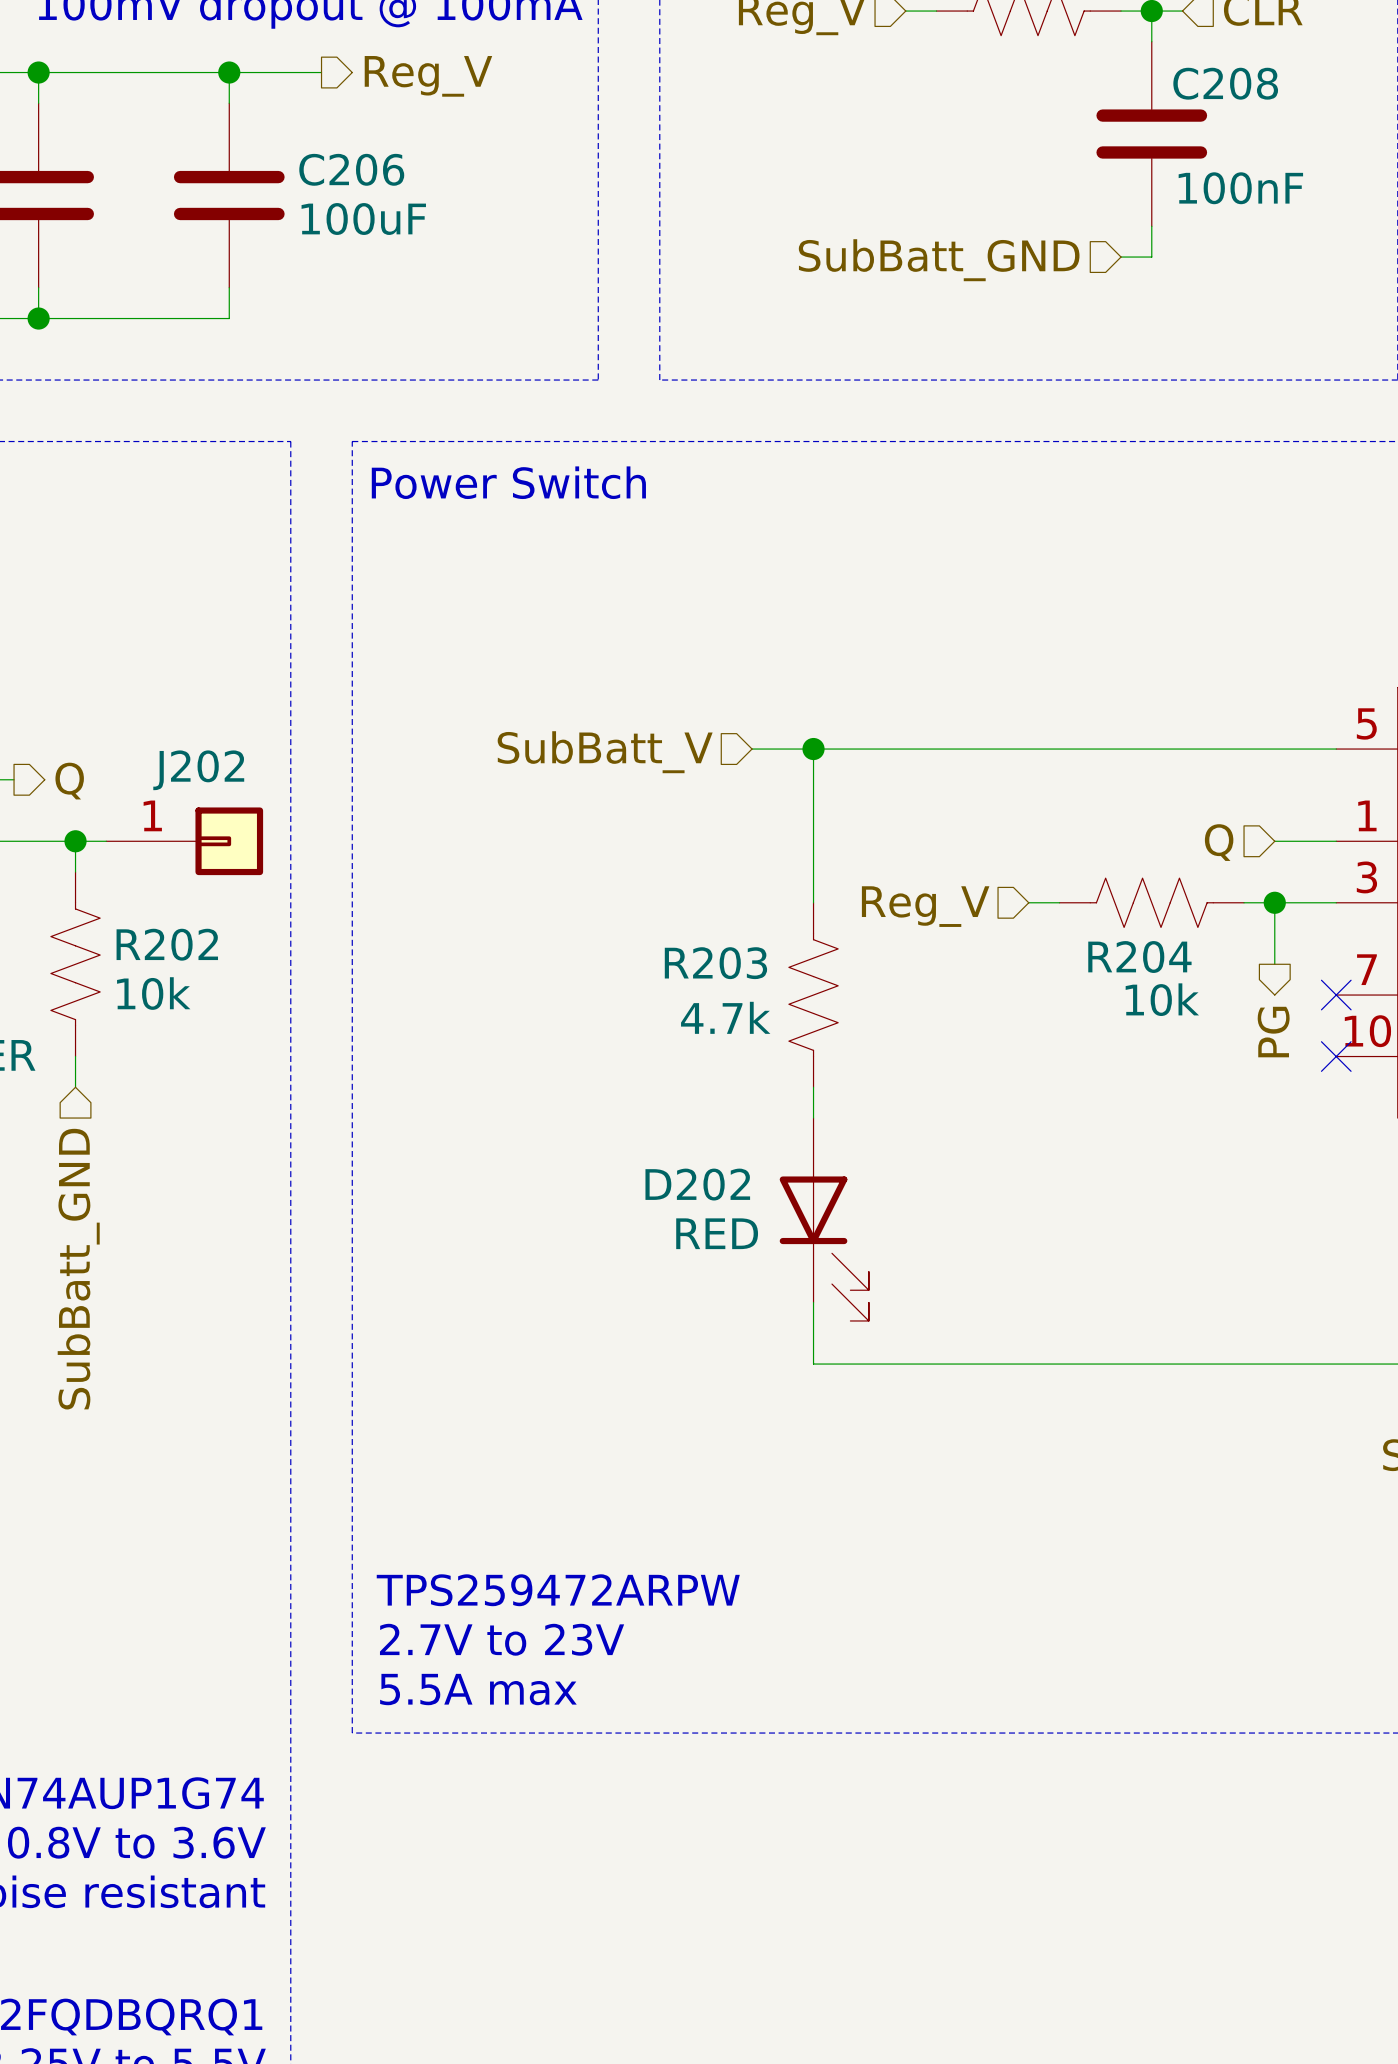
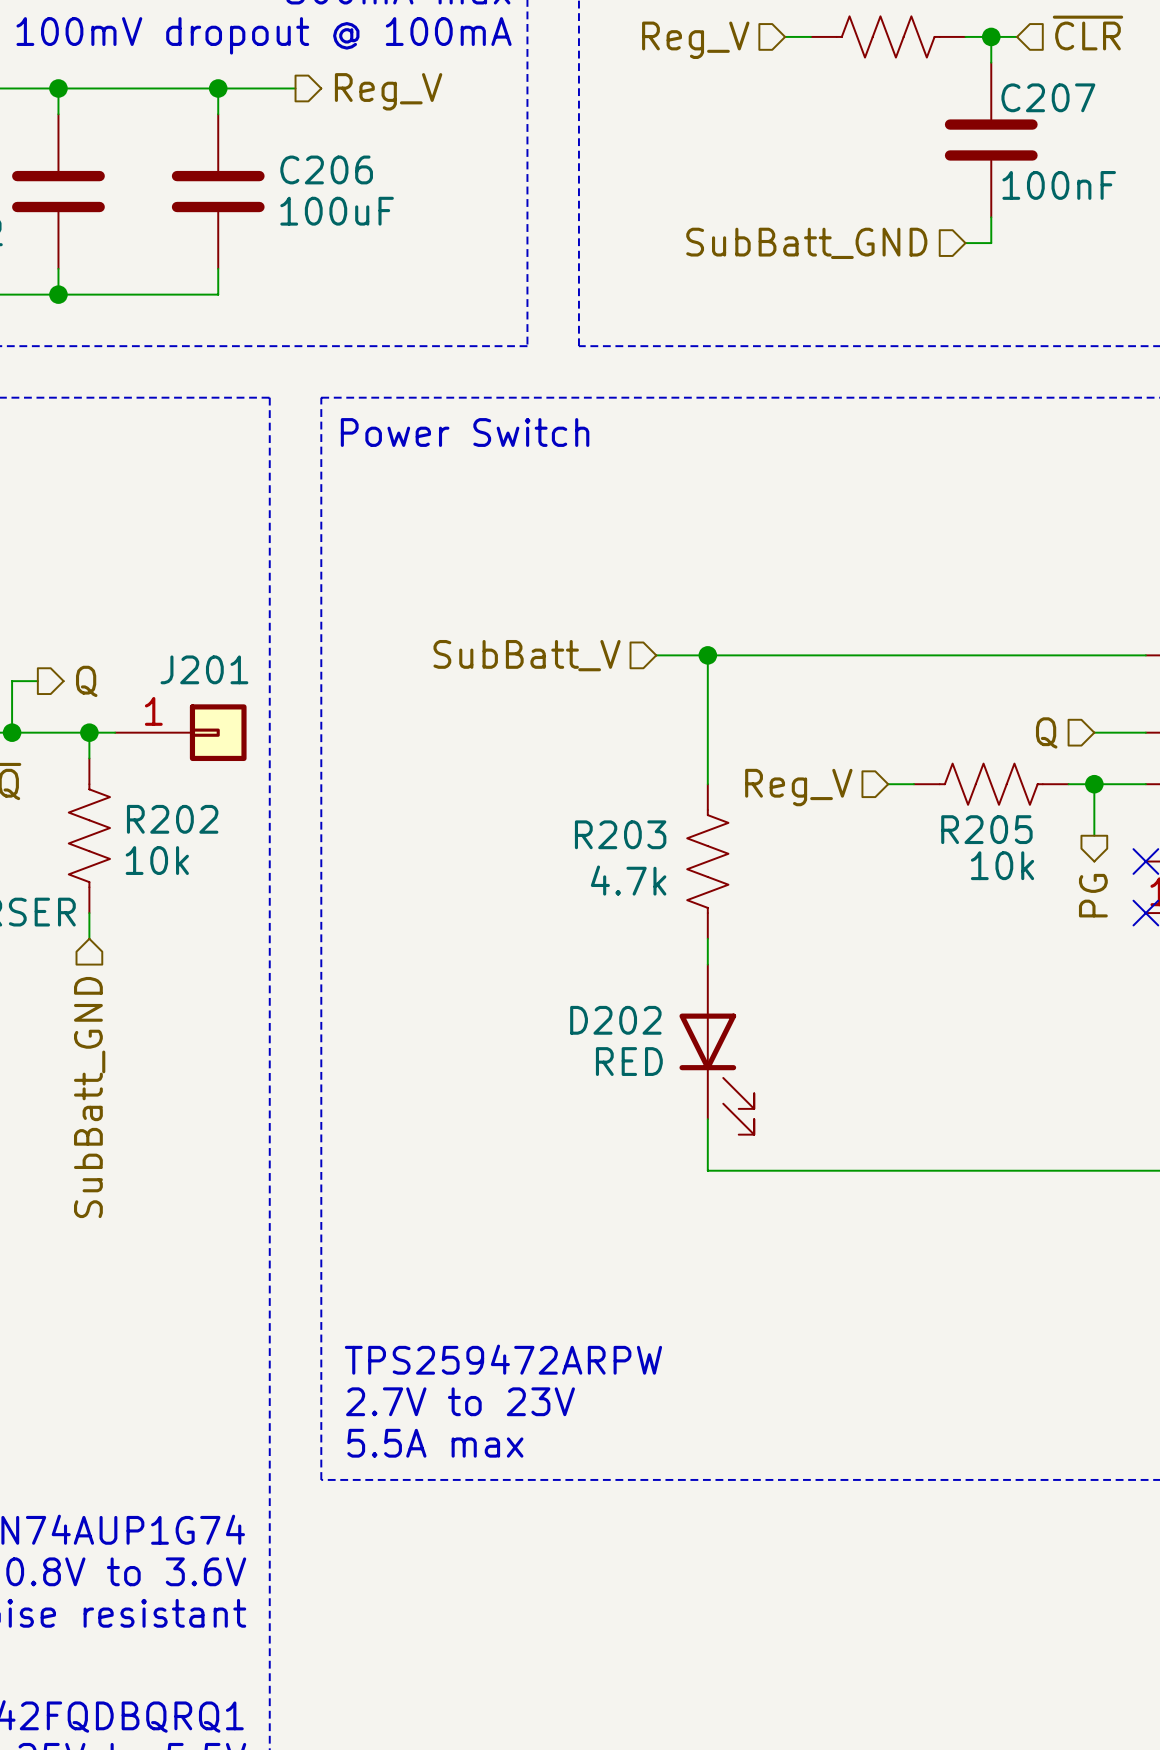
C208 name: C208 (1225, 83) -> C207 (1048, 97)
J202 name: J202 (198, 770) -> J201 (204, 669)
R204 name: R204 (1139, 957) -> R205 (986, 829)

